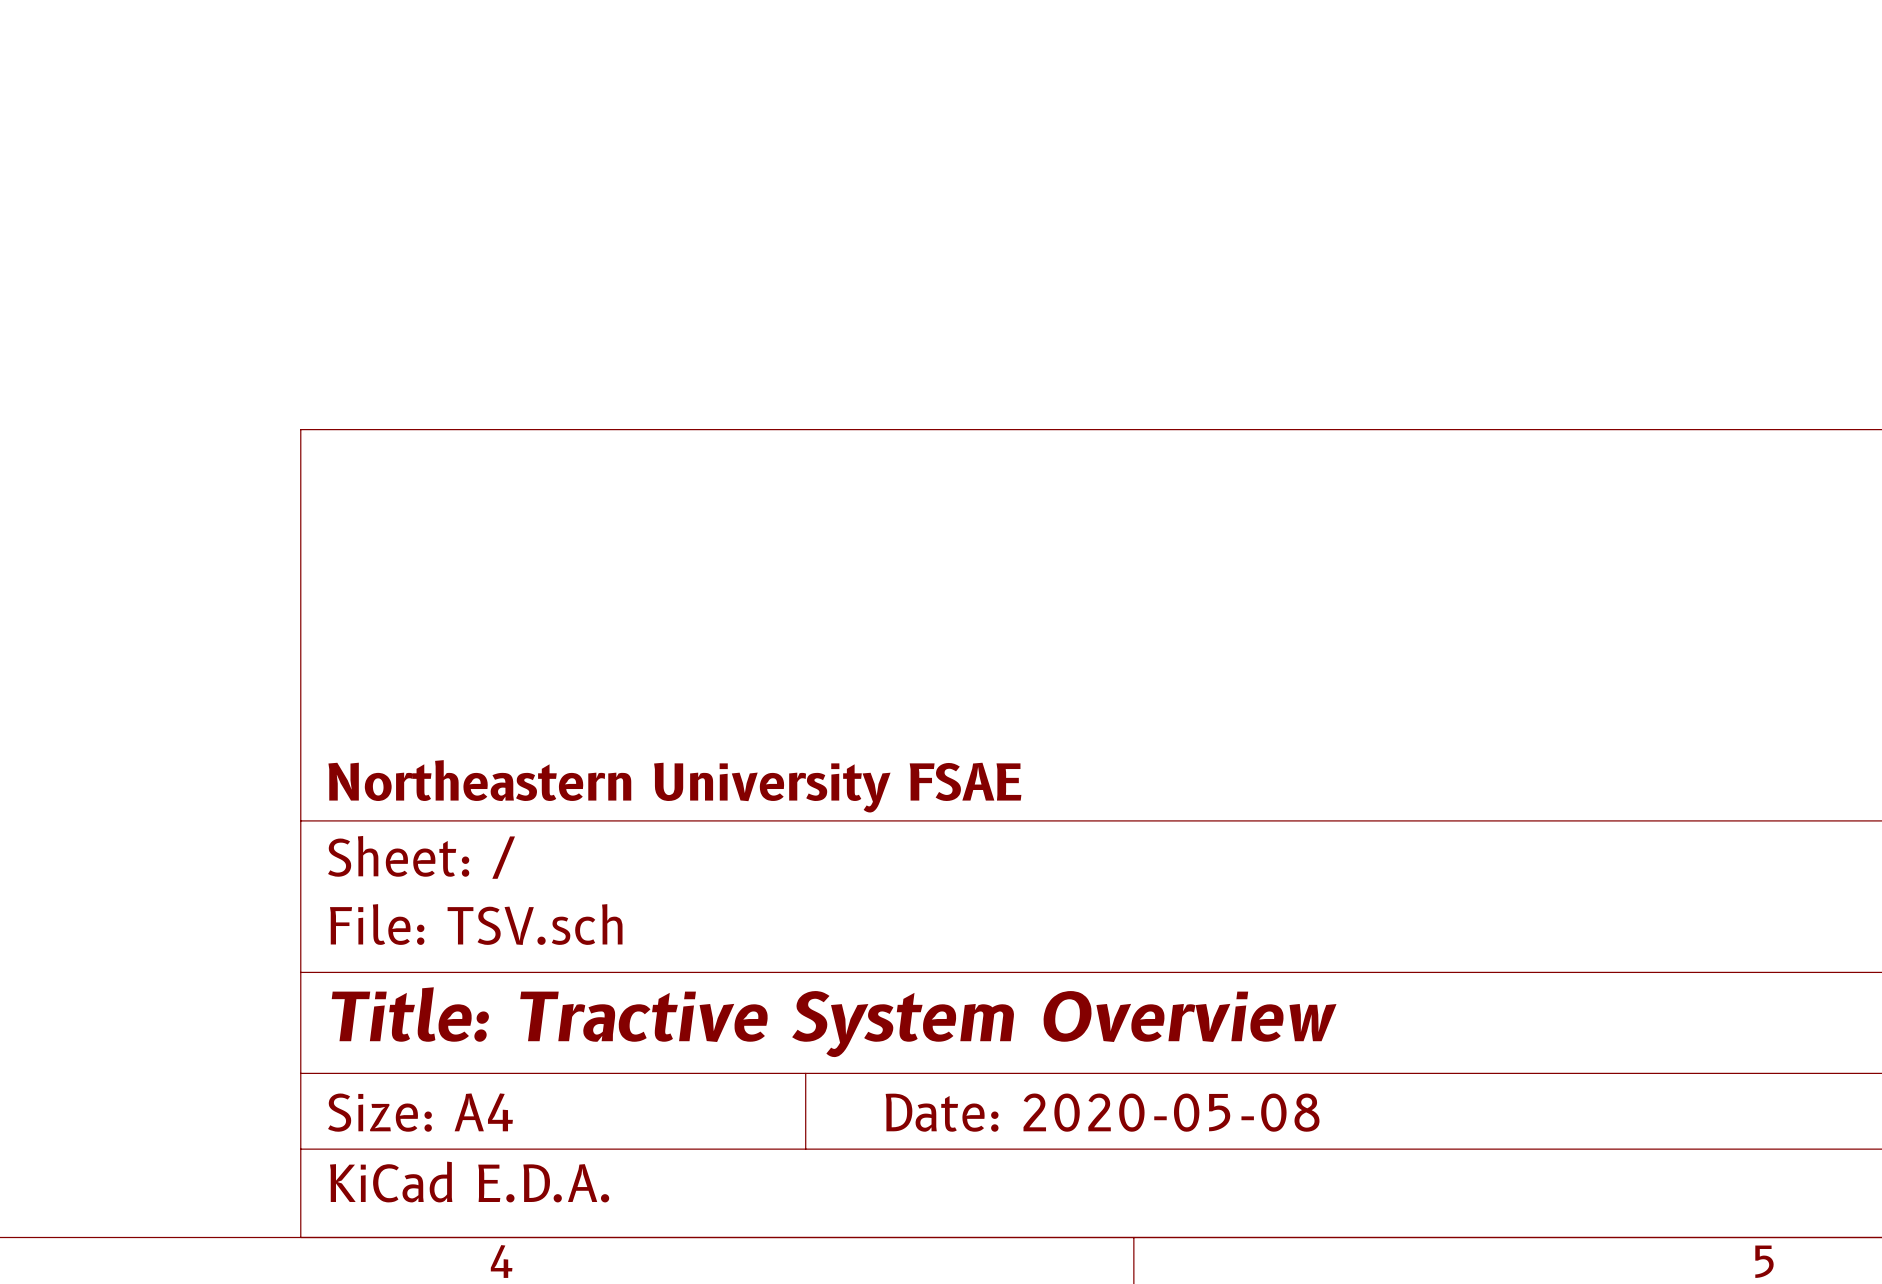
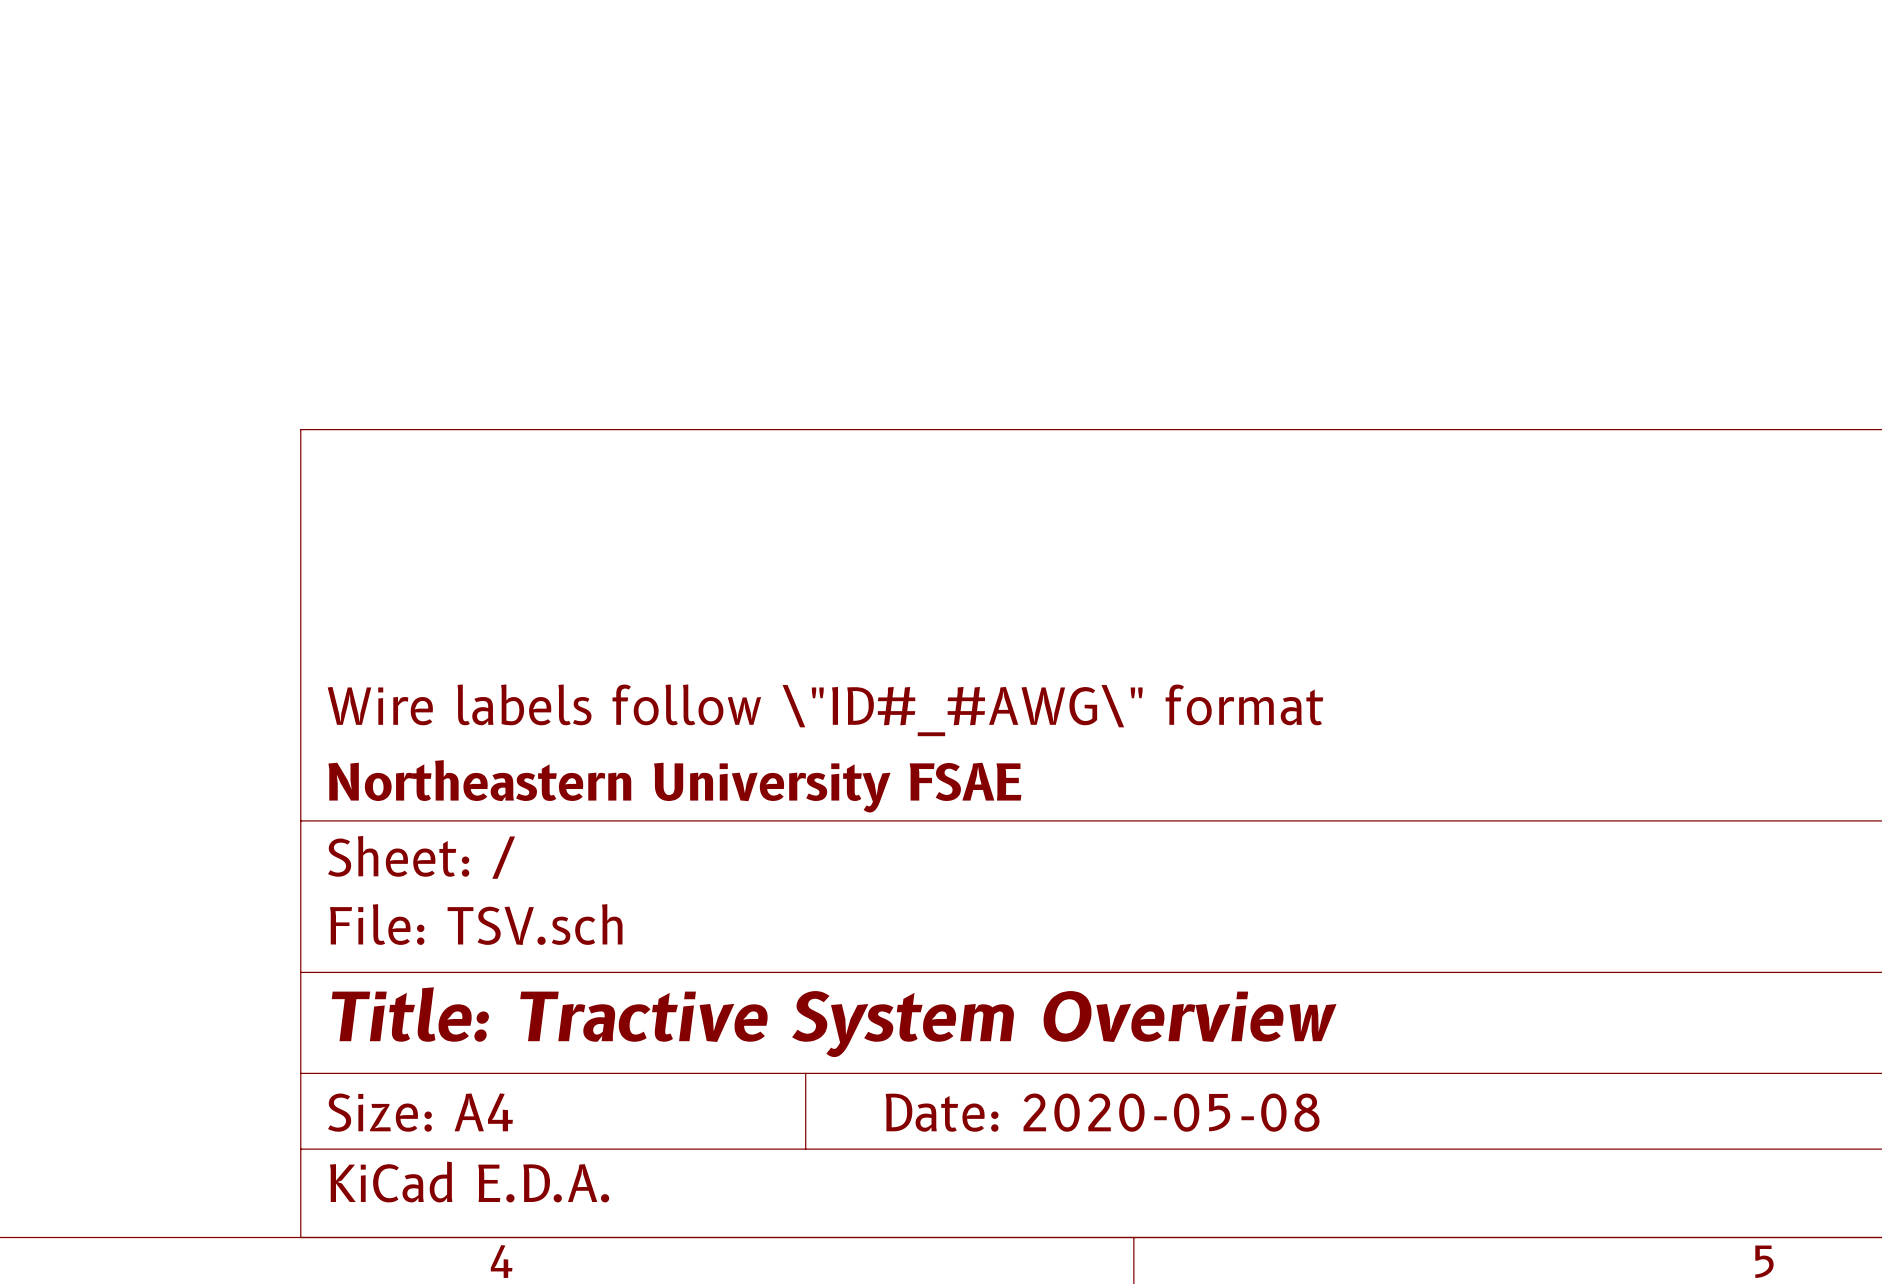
title block: none -> Wire labels follow \"ID#_#AWG\" format (825, 710)

